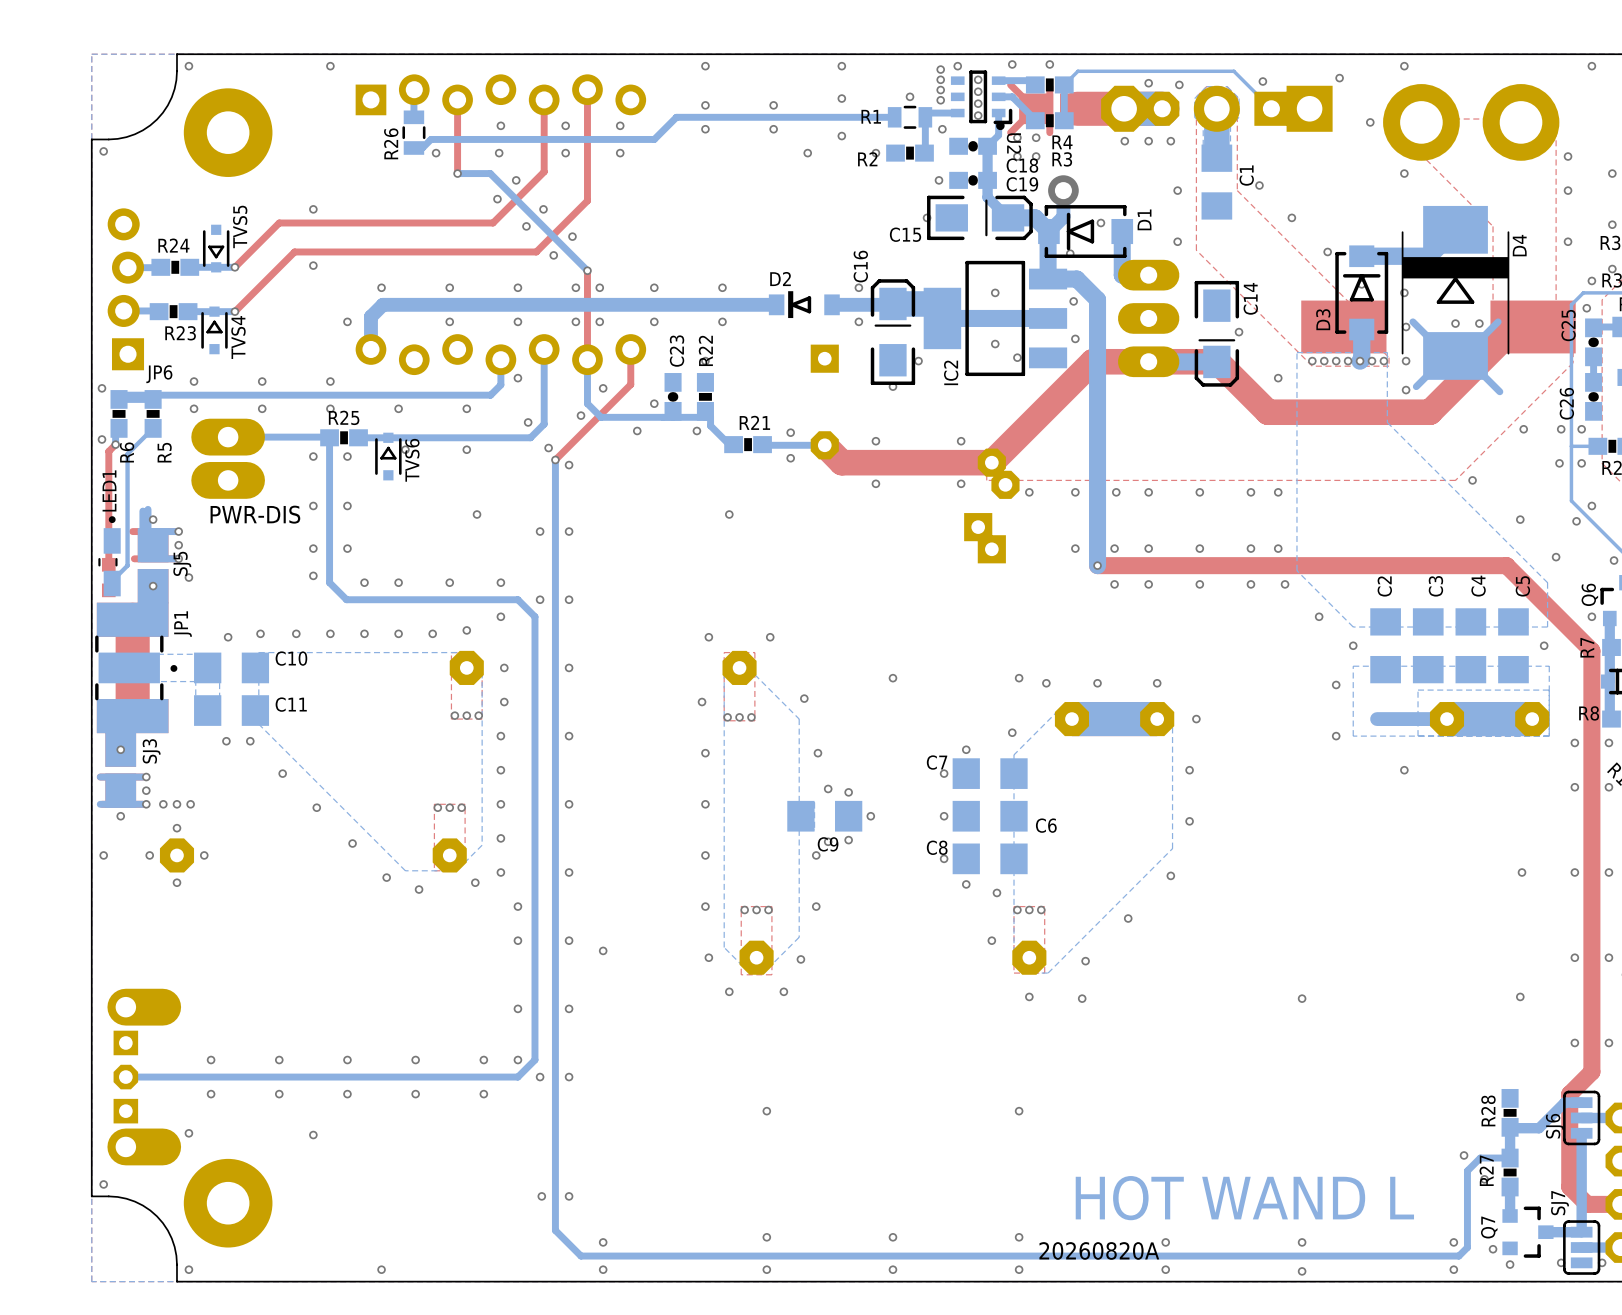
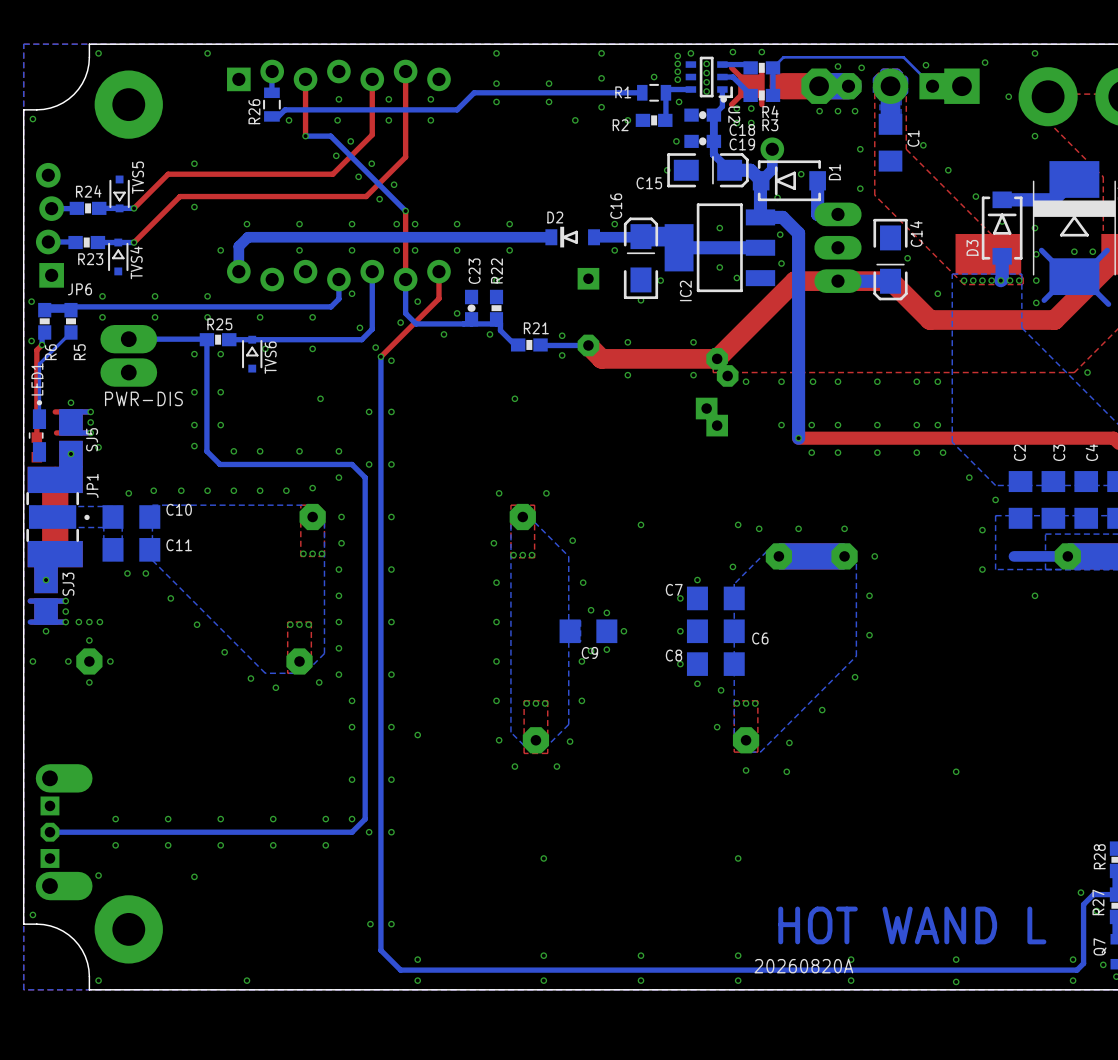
bottom track: (127, 453) (127, 565) (112, 580) (112, 583) -> (51, 352) (39, 364) (39, 419)
bottom track: (148, 509) (148, 545) -> none
bottom track: (142, 511) (142, 546) -> none

